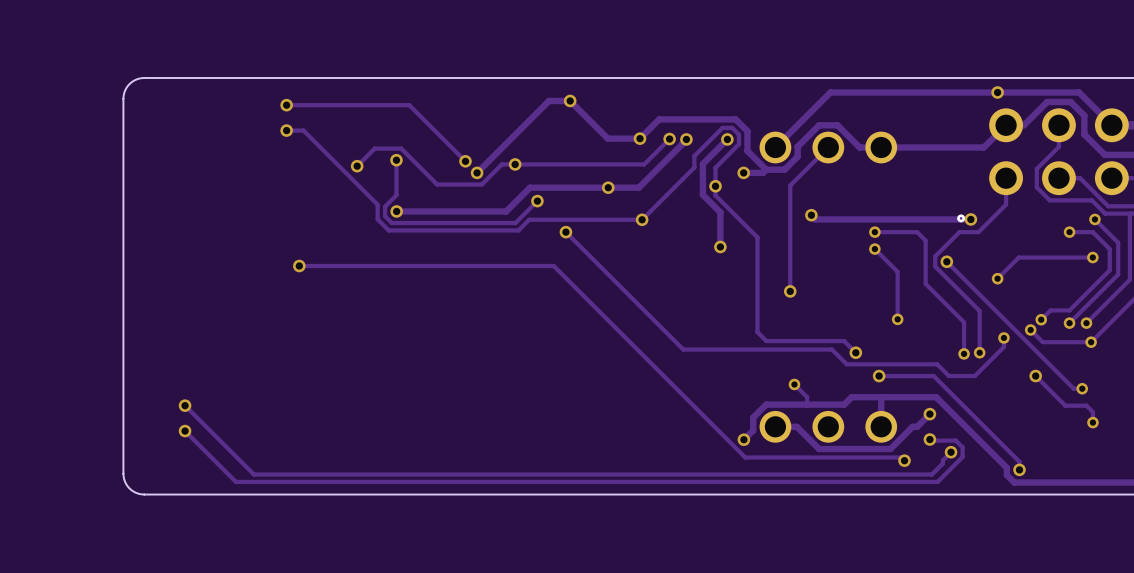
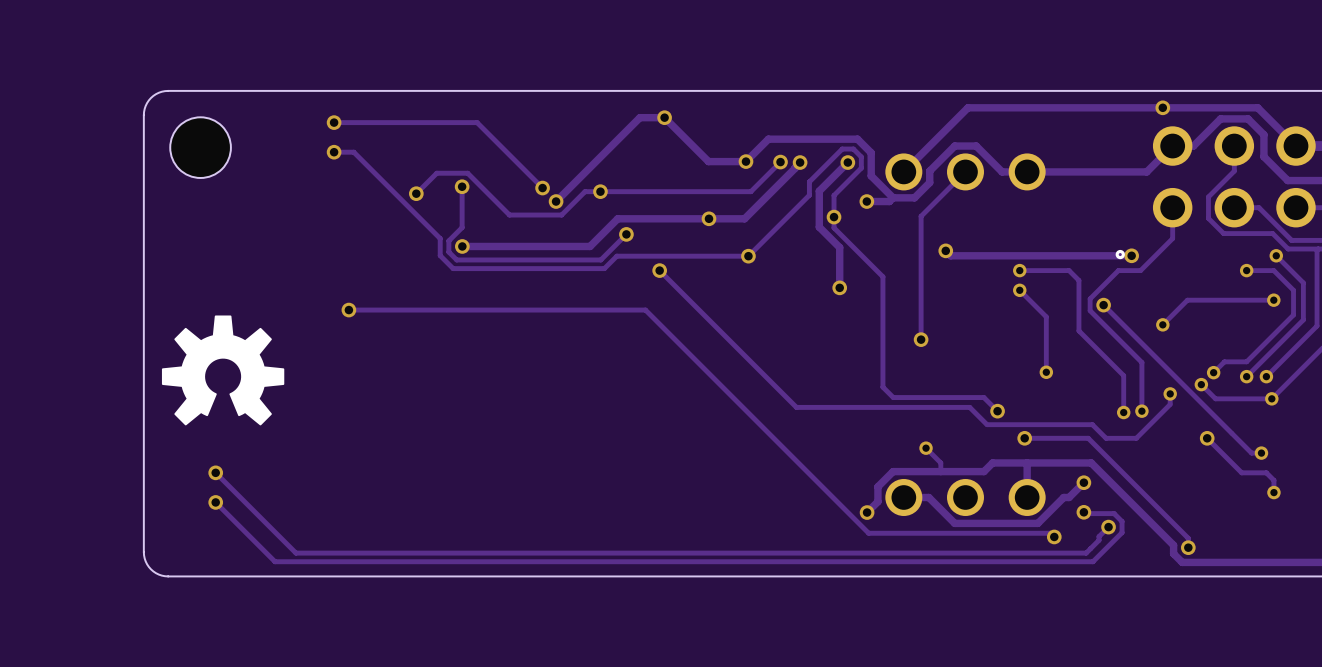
part: none -> (200, 147)
drawing: none -> [161, 315, 285, 426]

